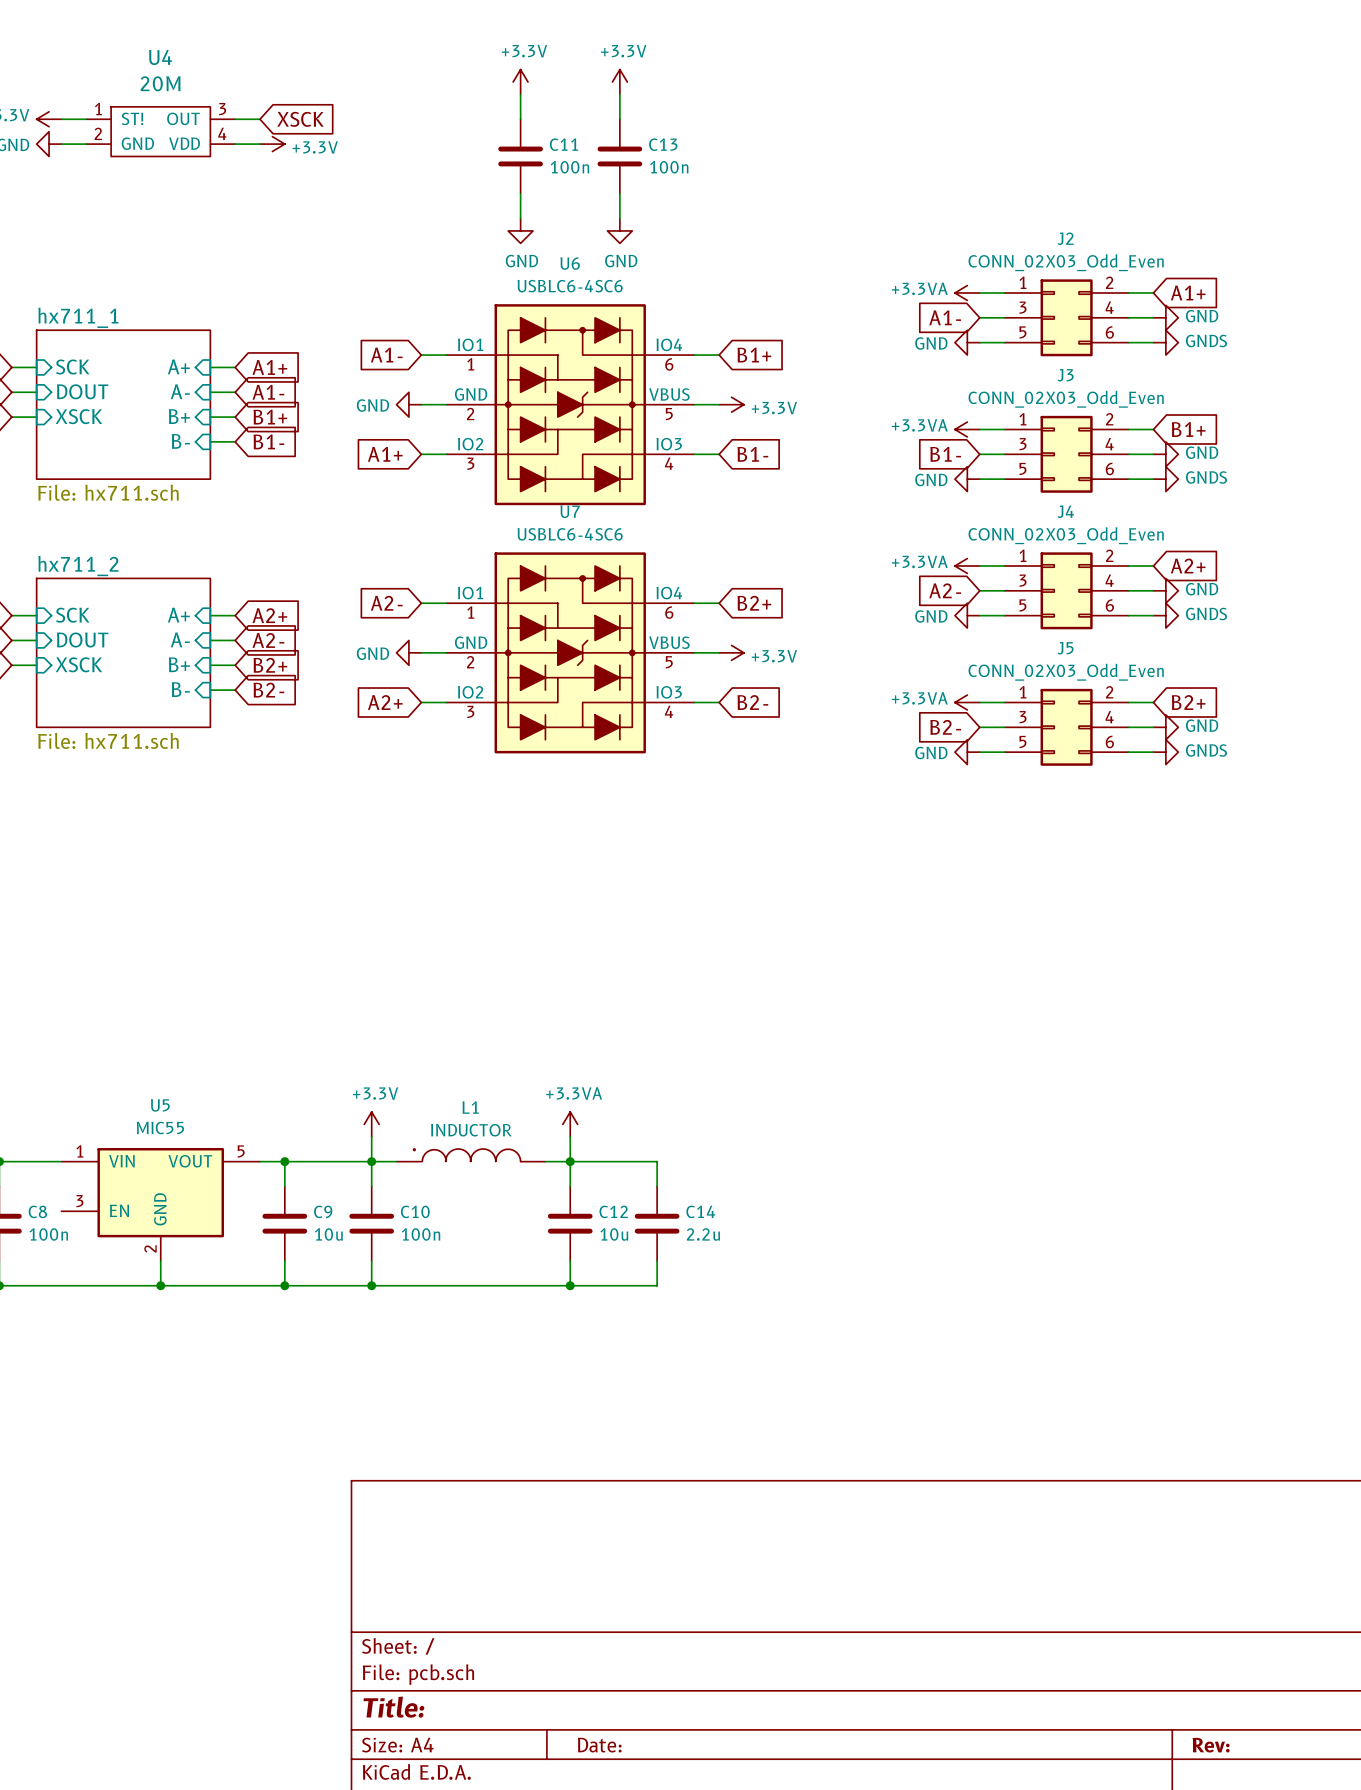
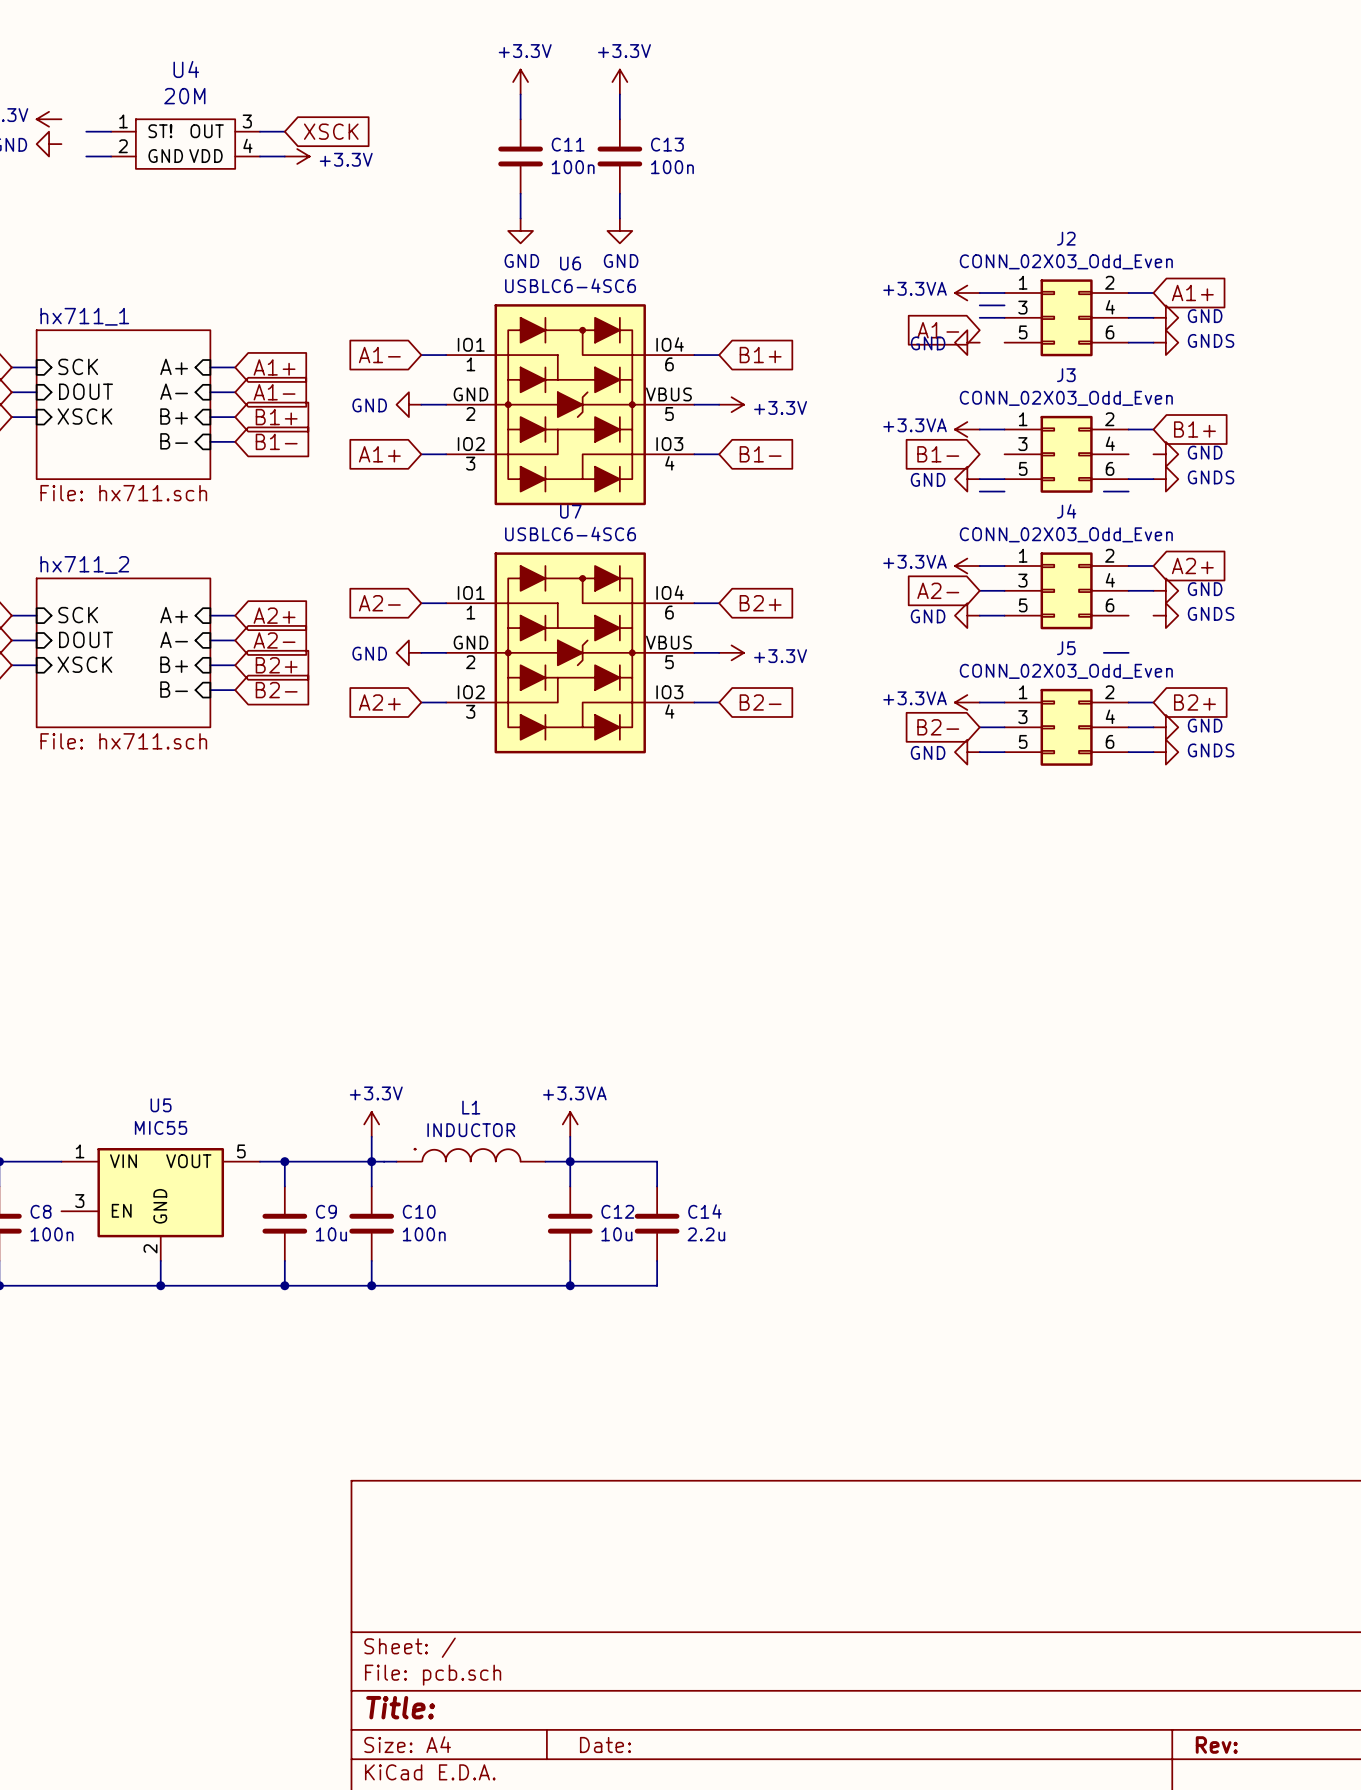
wire: (61, 119) (86, 119) -> (86, 131) (111, 131)
wire: (235, 119) (260, 119) -> (260, 131) (284, 131)
global label position: XSCK (300, 119) -> XSCK (331, 131)
U4 position: (160, 131) -> (185, 144)
wire: (61, 144) (86, 144) -> (86, 156) (111, 156)
wire: (235, 144) (260, 144) -> (260, 156) (284, 156)
power symbol position: +3.3V (272, 144) -> +3.3V (297, 156)
global label position: A1- (945, 317) -> A1- (938, 330)
wire: (979, 342) (1004, 342) -> (979, 305) (1004, 305)
wire: (979, 454) (1004, 454) -> (979, 491) (1004, 491)
wire: (1128, 454) (1153, 454) -> (1103, 491) (1128, 491)
wire: (1128, 615) (1153, 615) -> (1103, 652) (1128, 652)

